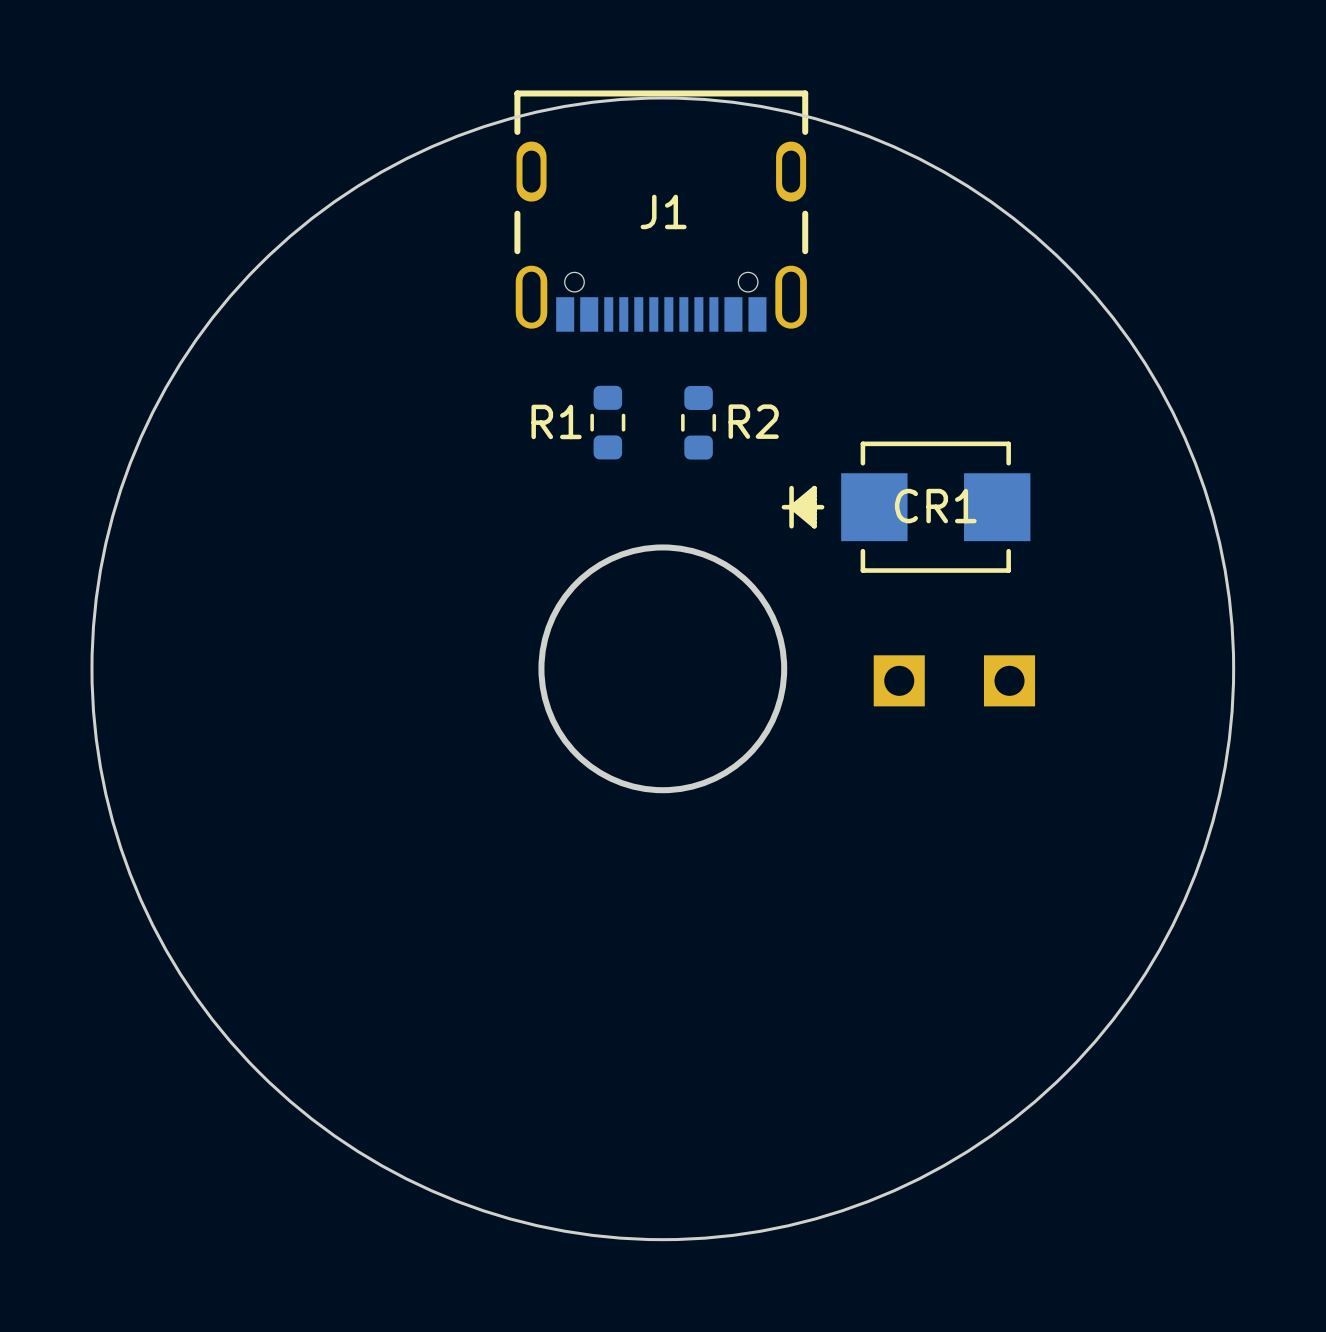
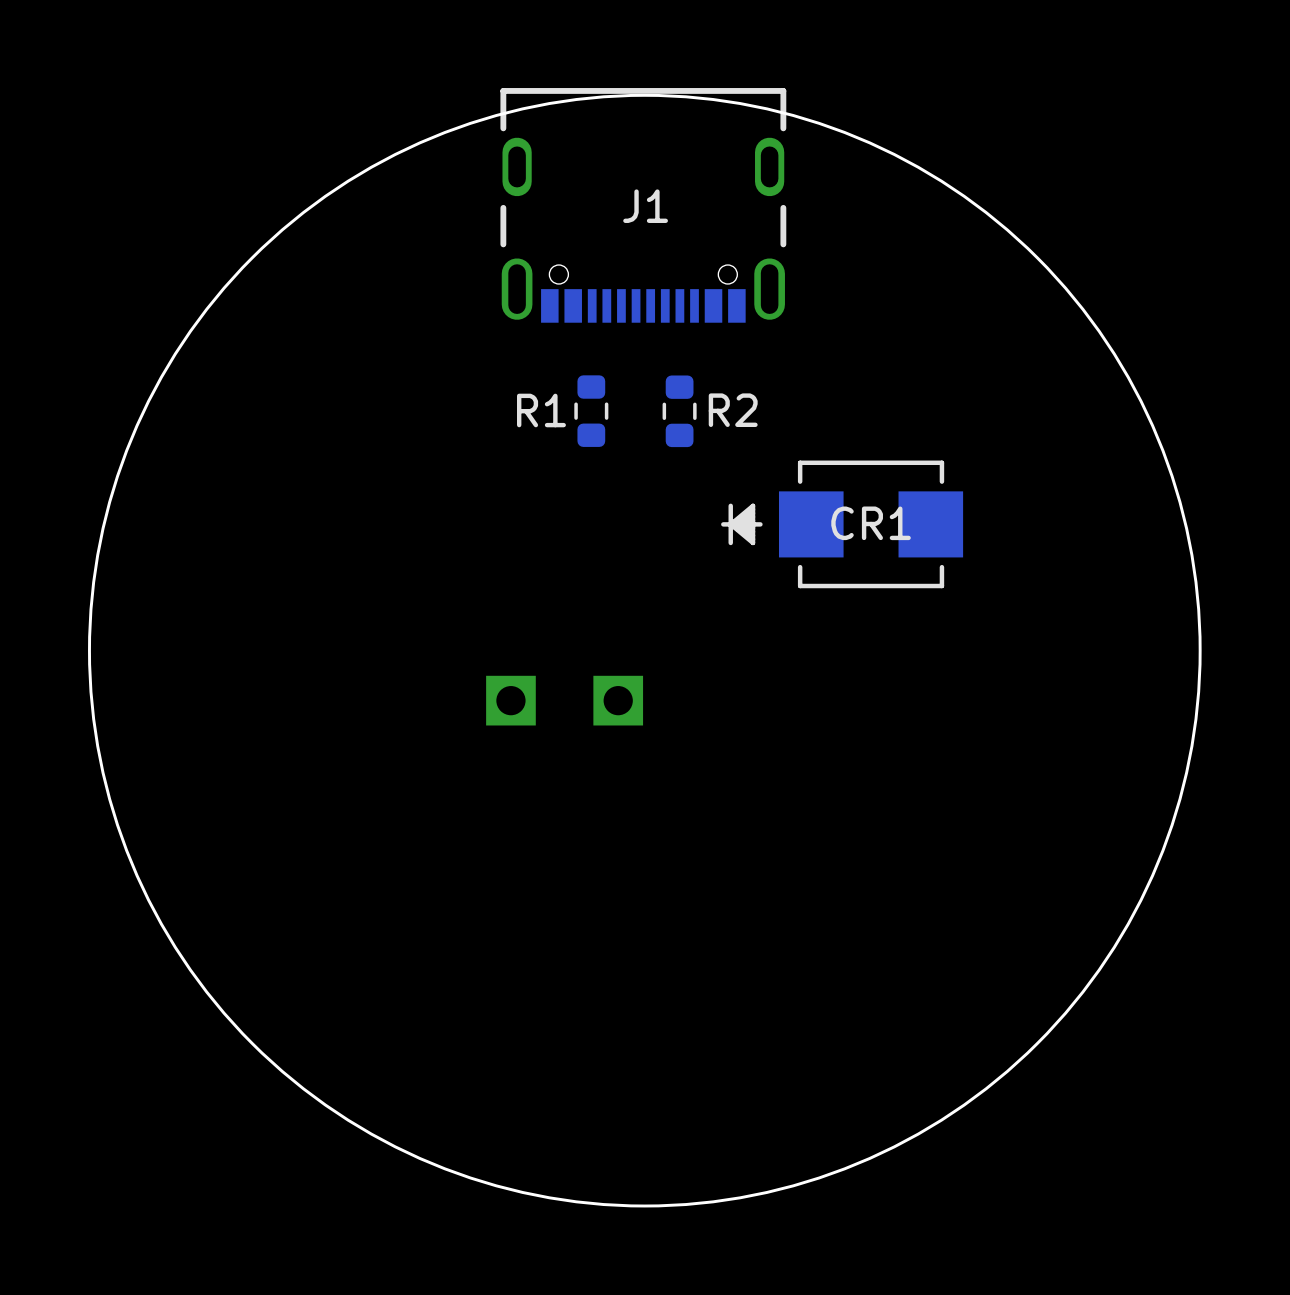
CR1 position: (906, 507) -> (842, 524)
round board edge: [538, 544, 788, 794] -> none
part: (899, 680) -> none
part: (1009, 680) -> none
part: none -> (510, 700)
part: none -> (618, 700)

